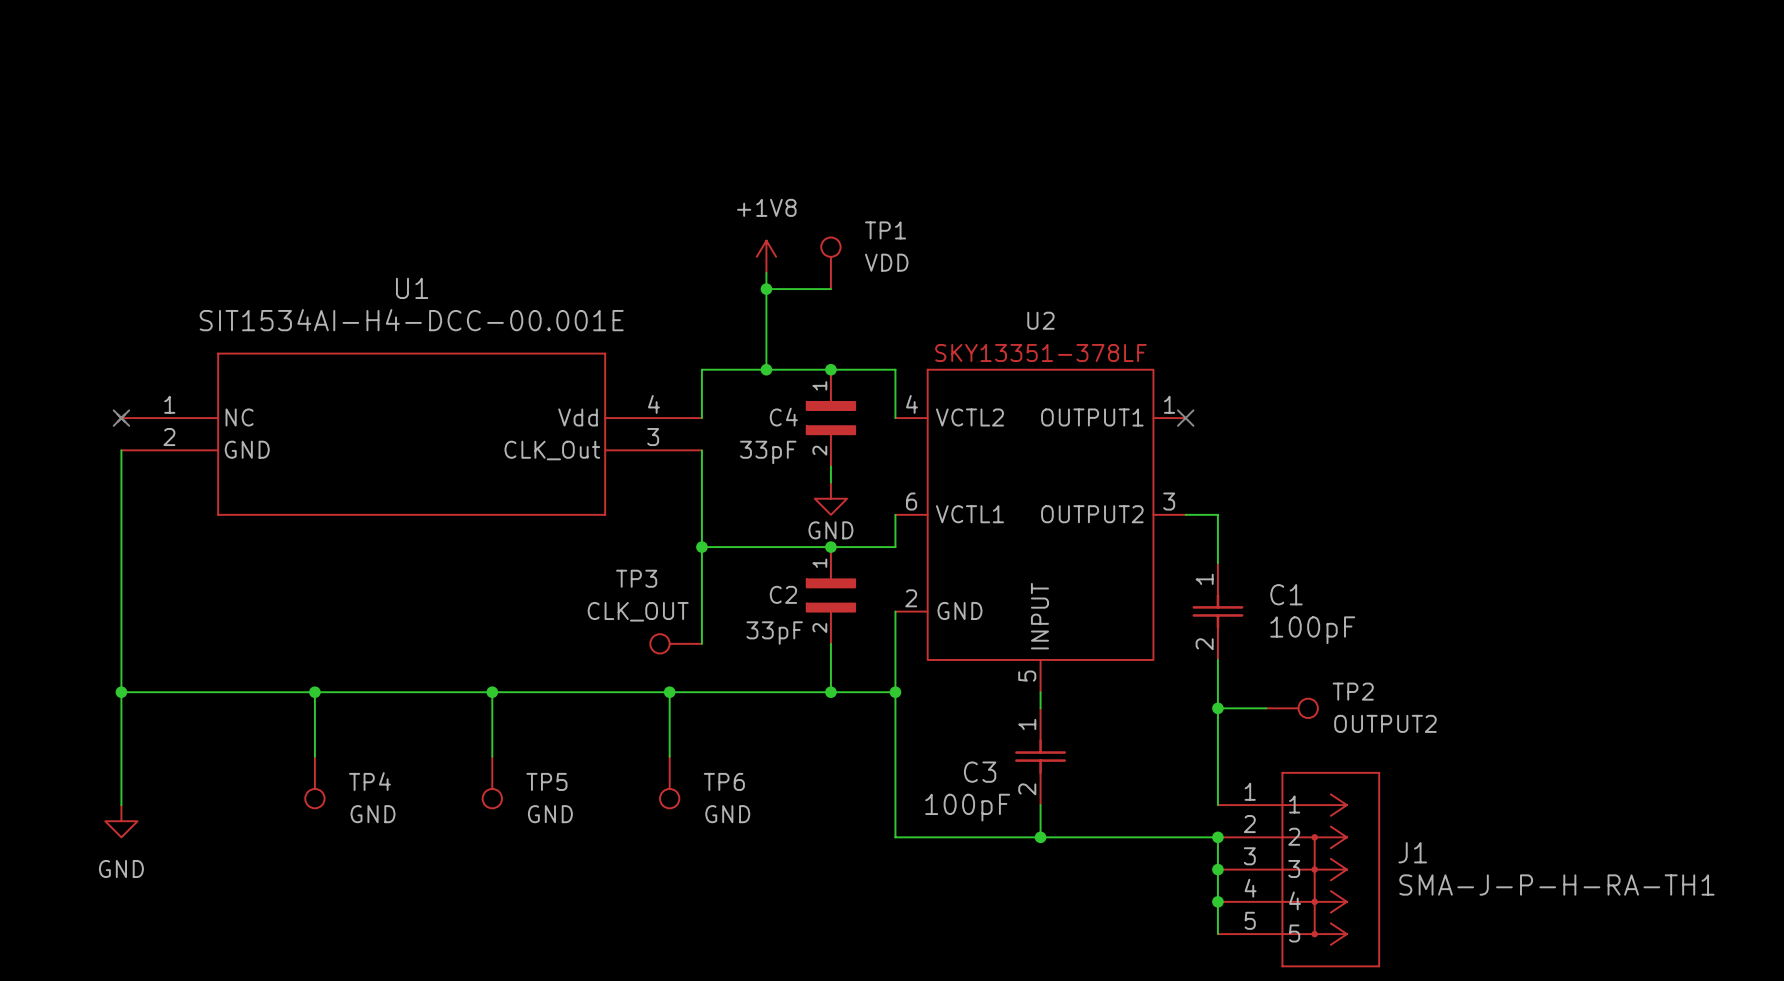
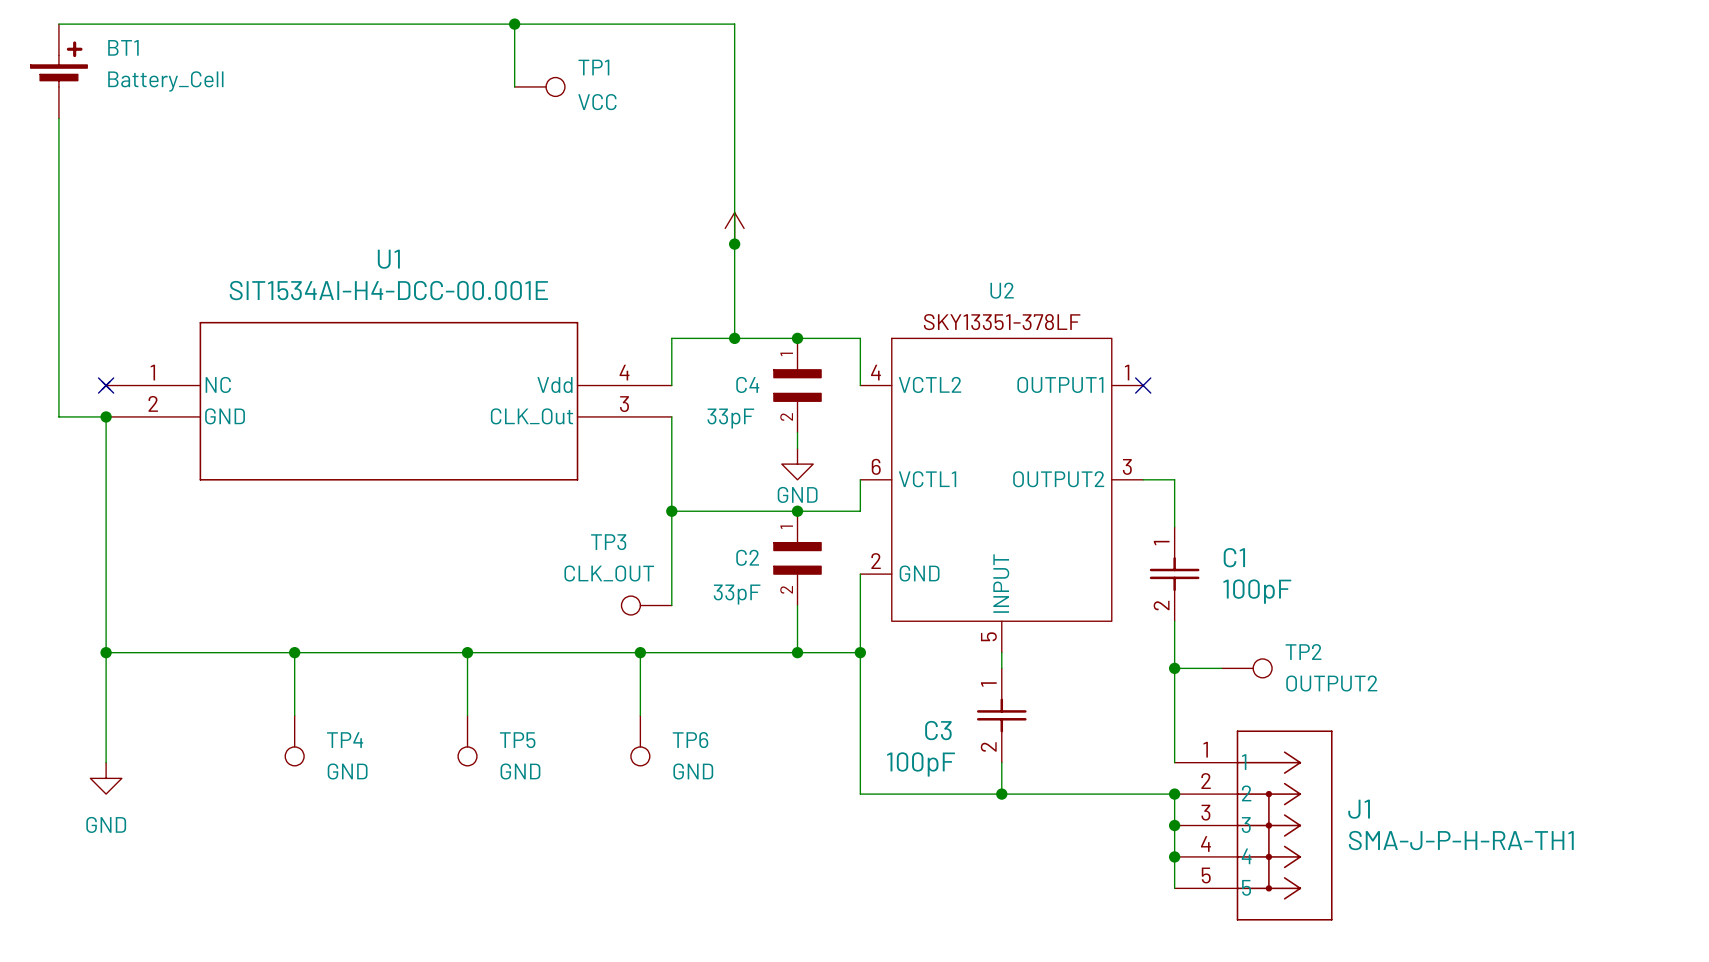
wire: none -> (58, 24) (734, 24) (734, 244)
wire: none -> (514, 24) (514, 86)
junction: none -> (514, 24)
BT1: none -> Battery_Cell (58, 71)
wire: none -> (58, 118) (58, 416) (106, 416)
power symbol text: +1V8 (766, 207) -> none
TP1 rotation: 0° (830, 247) -> 90° clockwise (555, 86)
TP1 value: VDD (886, 262) -> VCC (597, 102)
TP1 position: (830, 263) -> (539, 86)
wire: (766, 289) (830, 289) -> none
junction position: (766, 289) -> (734, 244)
junction: none -> (106, 416)

